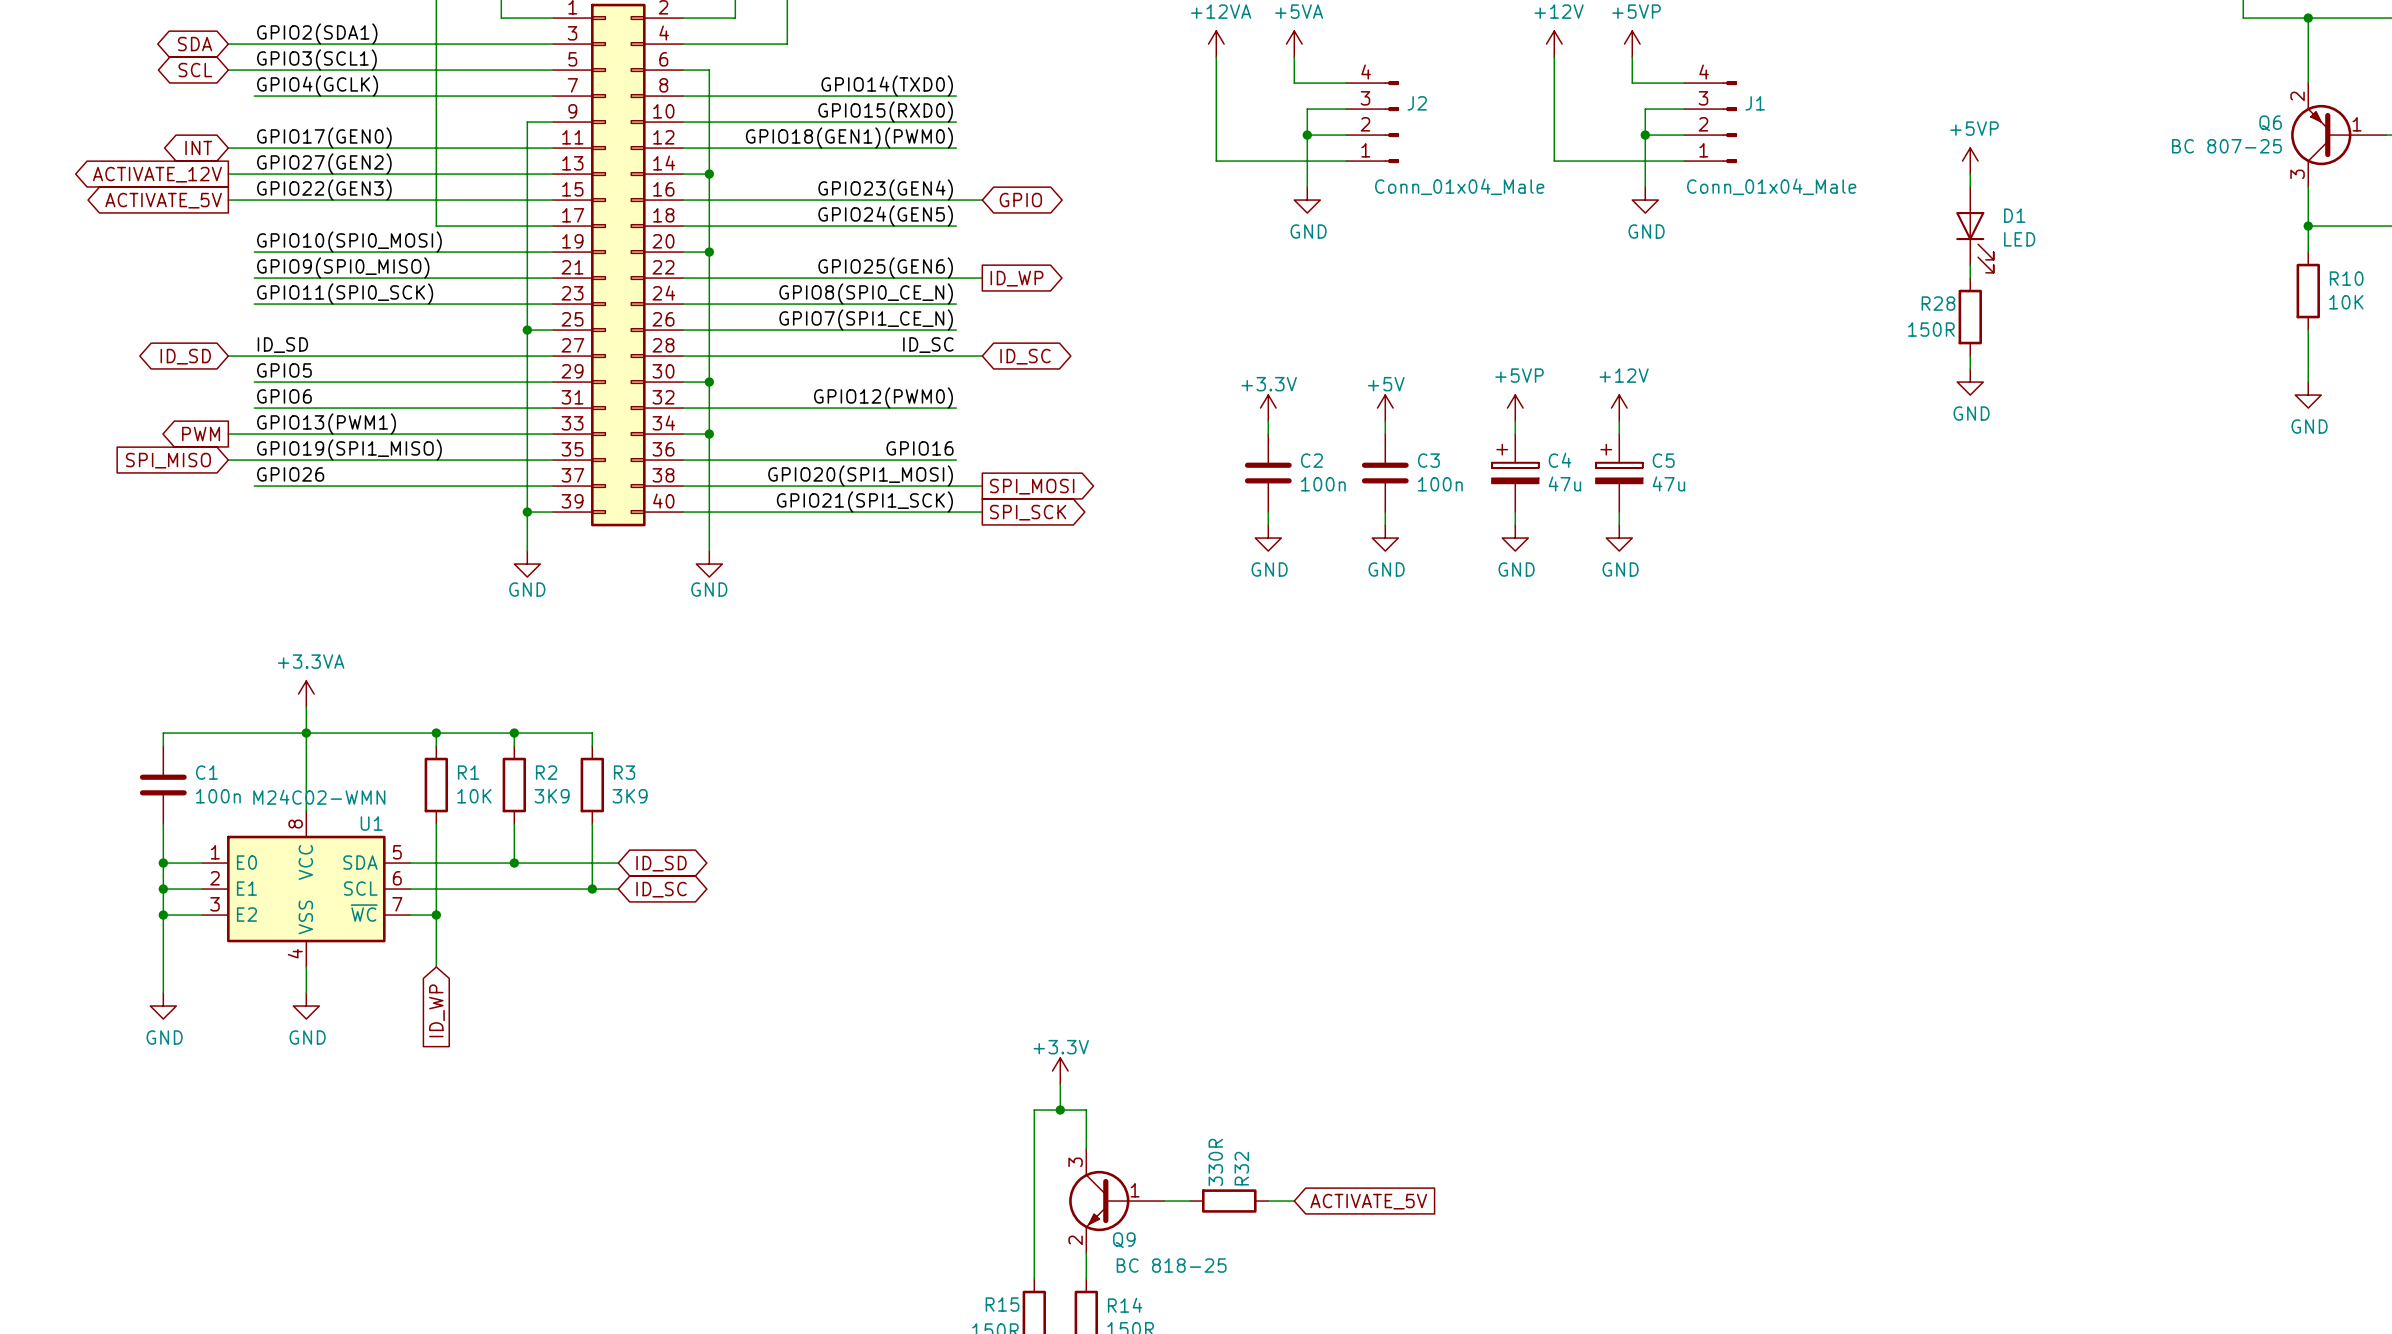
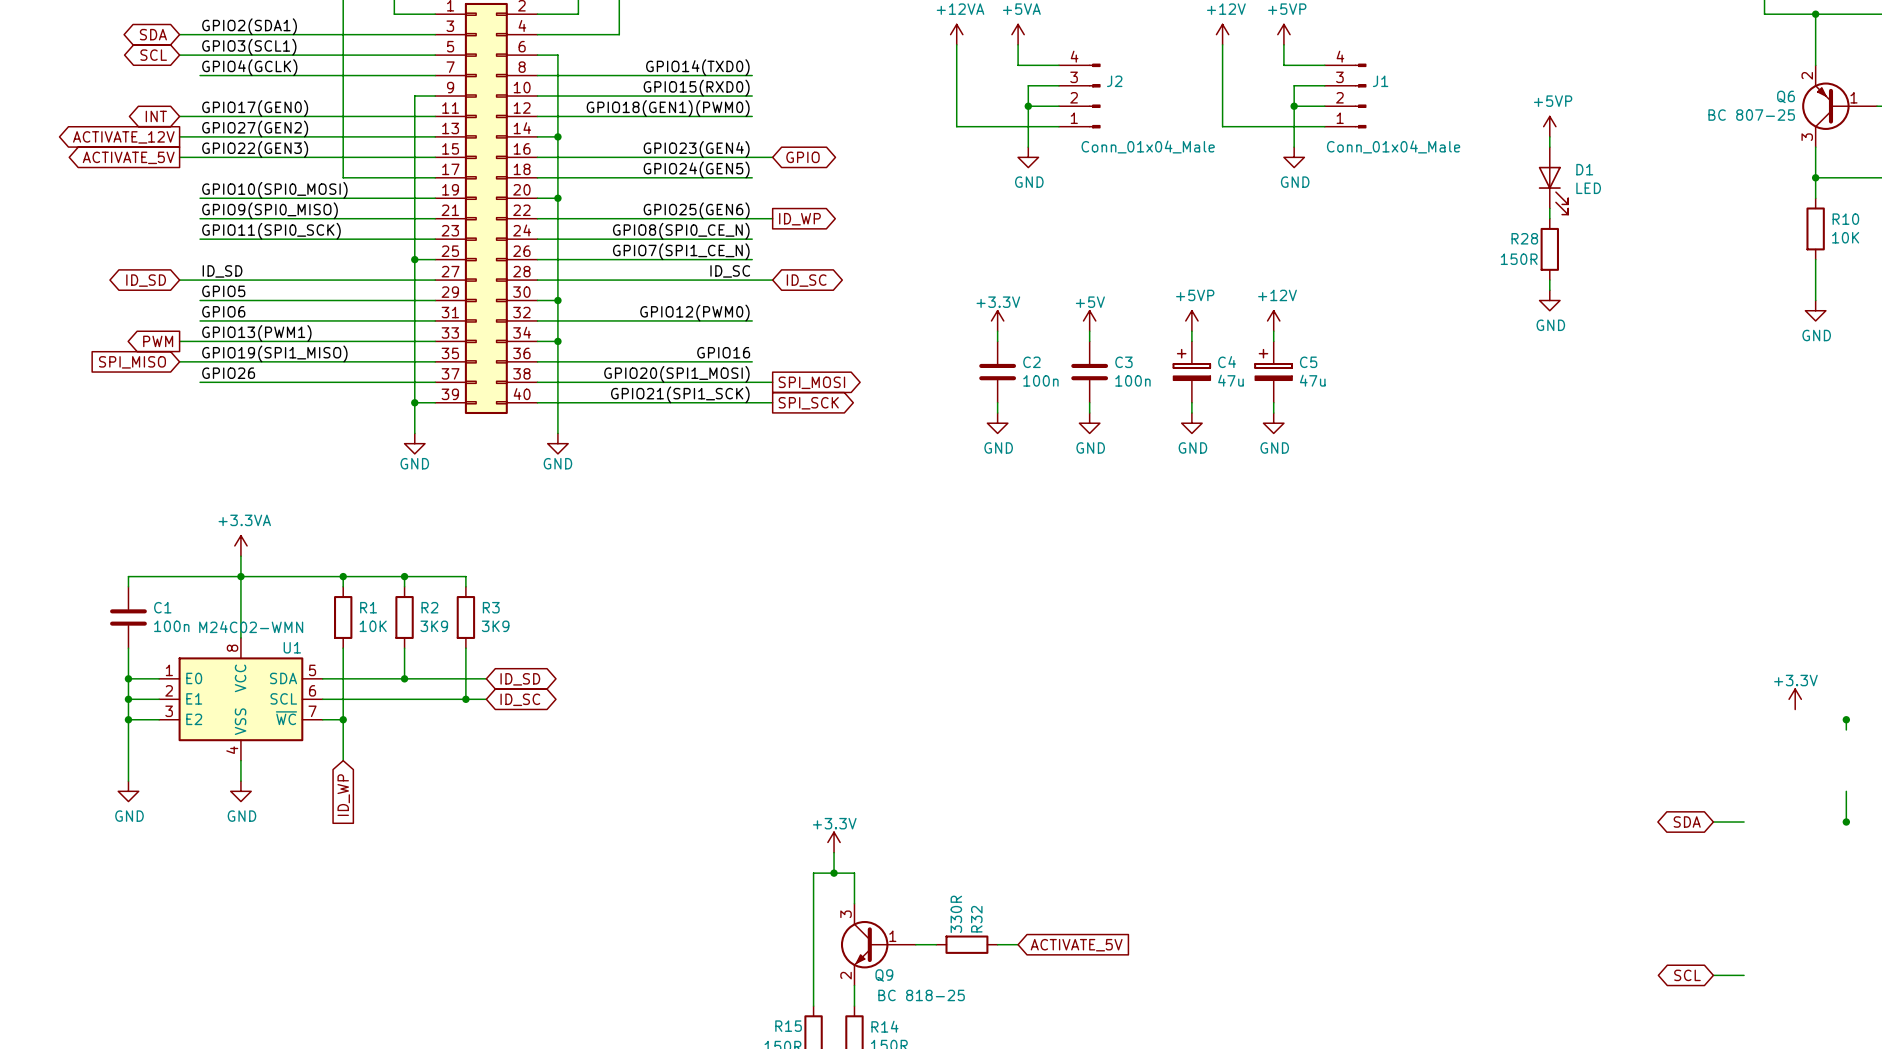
power symbol: none -> +3.3V (1795, 699)
wire: none -> (1846, 719) (1846, 729)
junction: none -> (1846, 719)
wire: none -> (1846, 791) (1846, 822)
global label: none -> SDA (1687, 822)
wire: none -> (1713, 822) (1744, 822)
junction: none -> (1846, 822)
global label: none -> SCL (1687, 975)
wire: none -> (1713, 975) (1744, 975)

